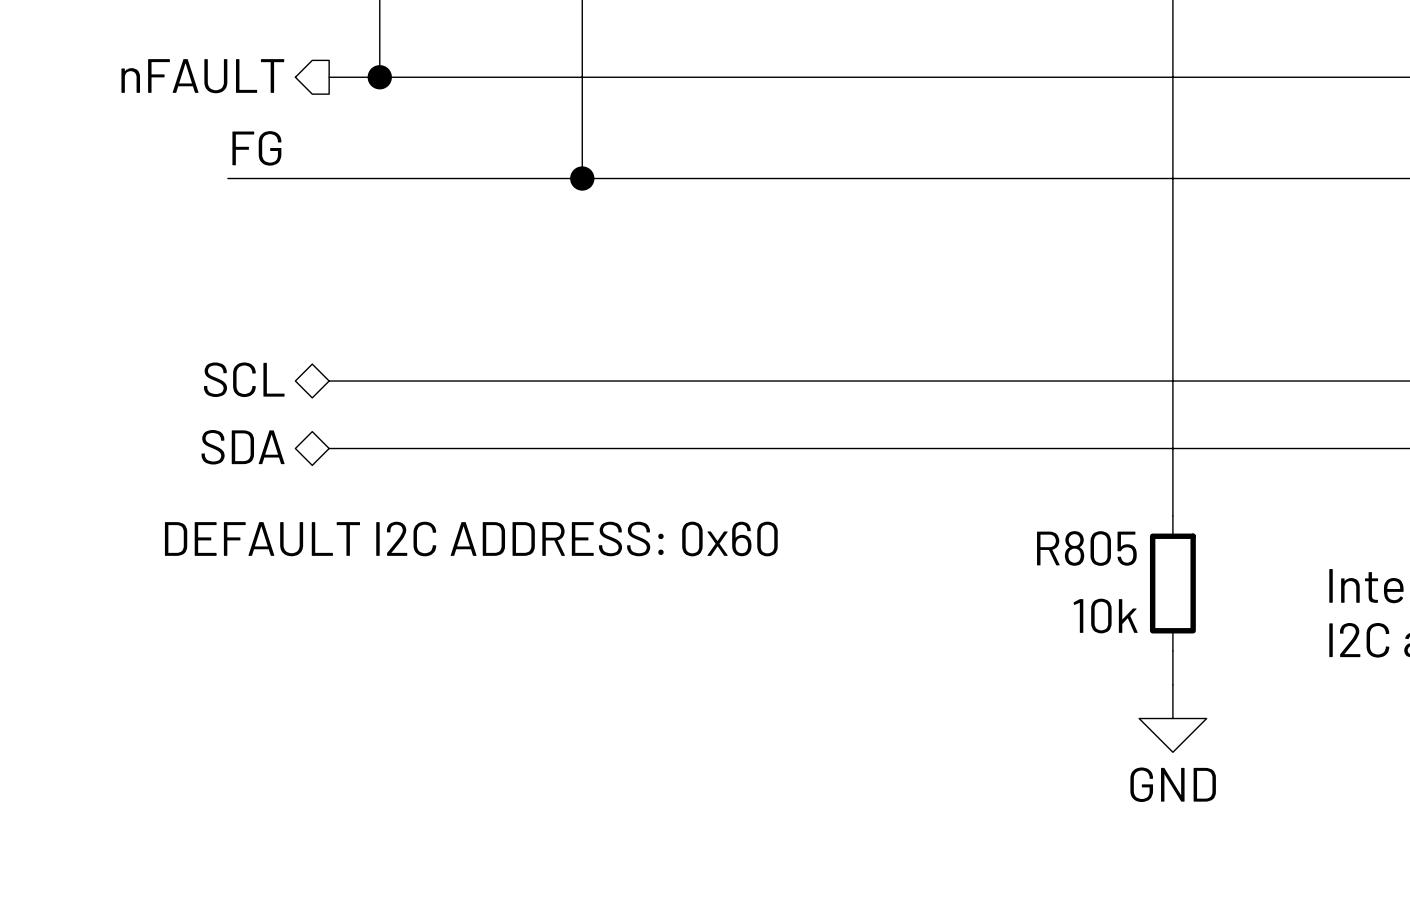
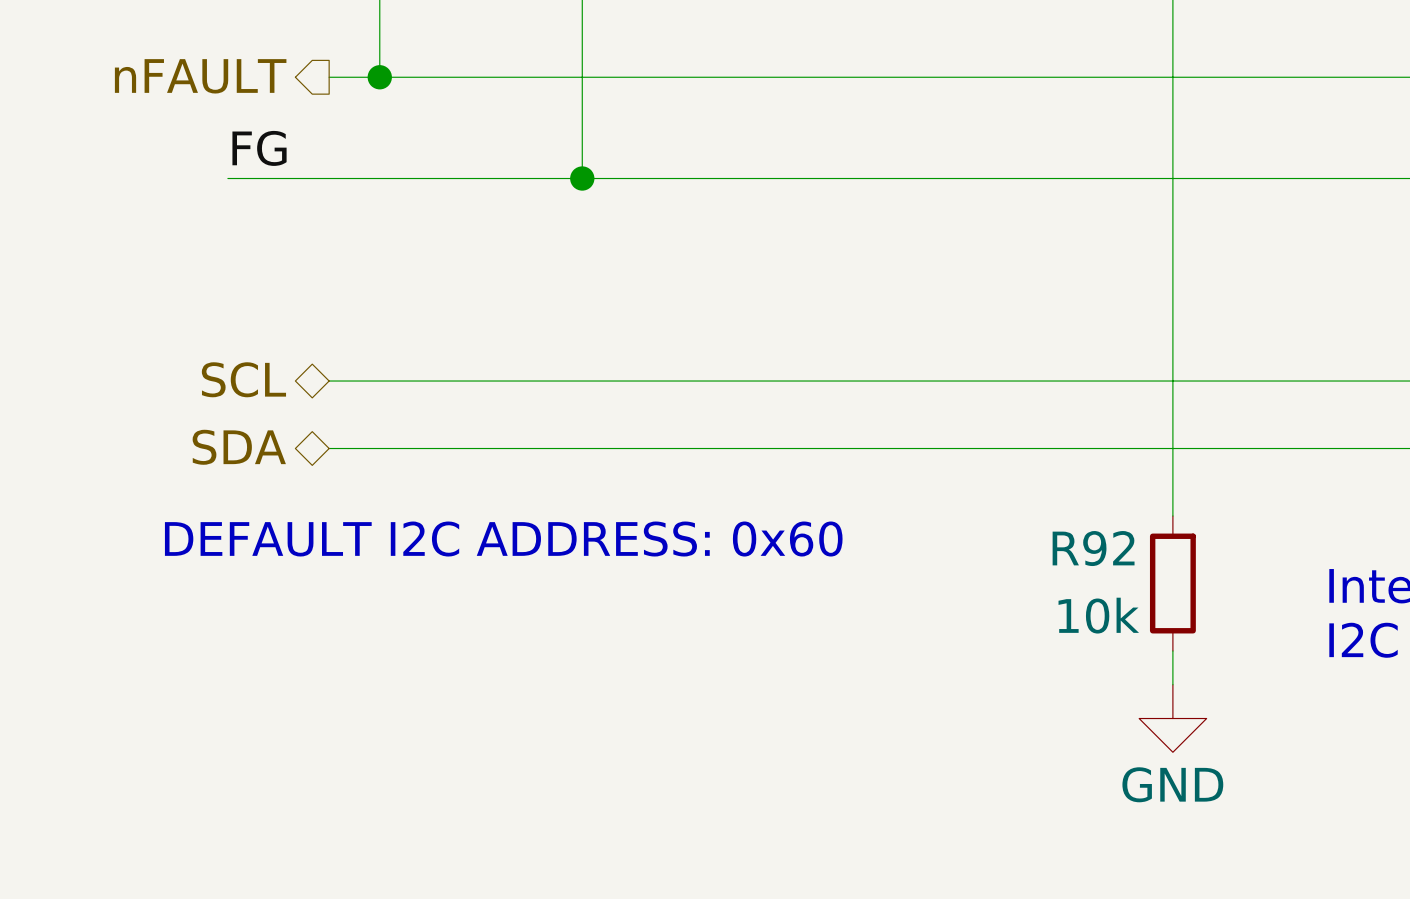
R805 name: R805 (1086, 548) -> R92 (1093, 548)

